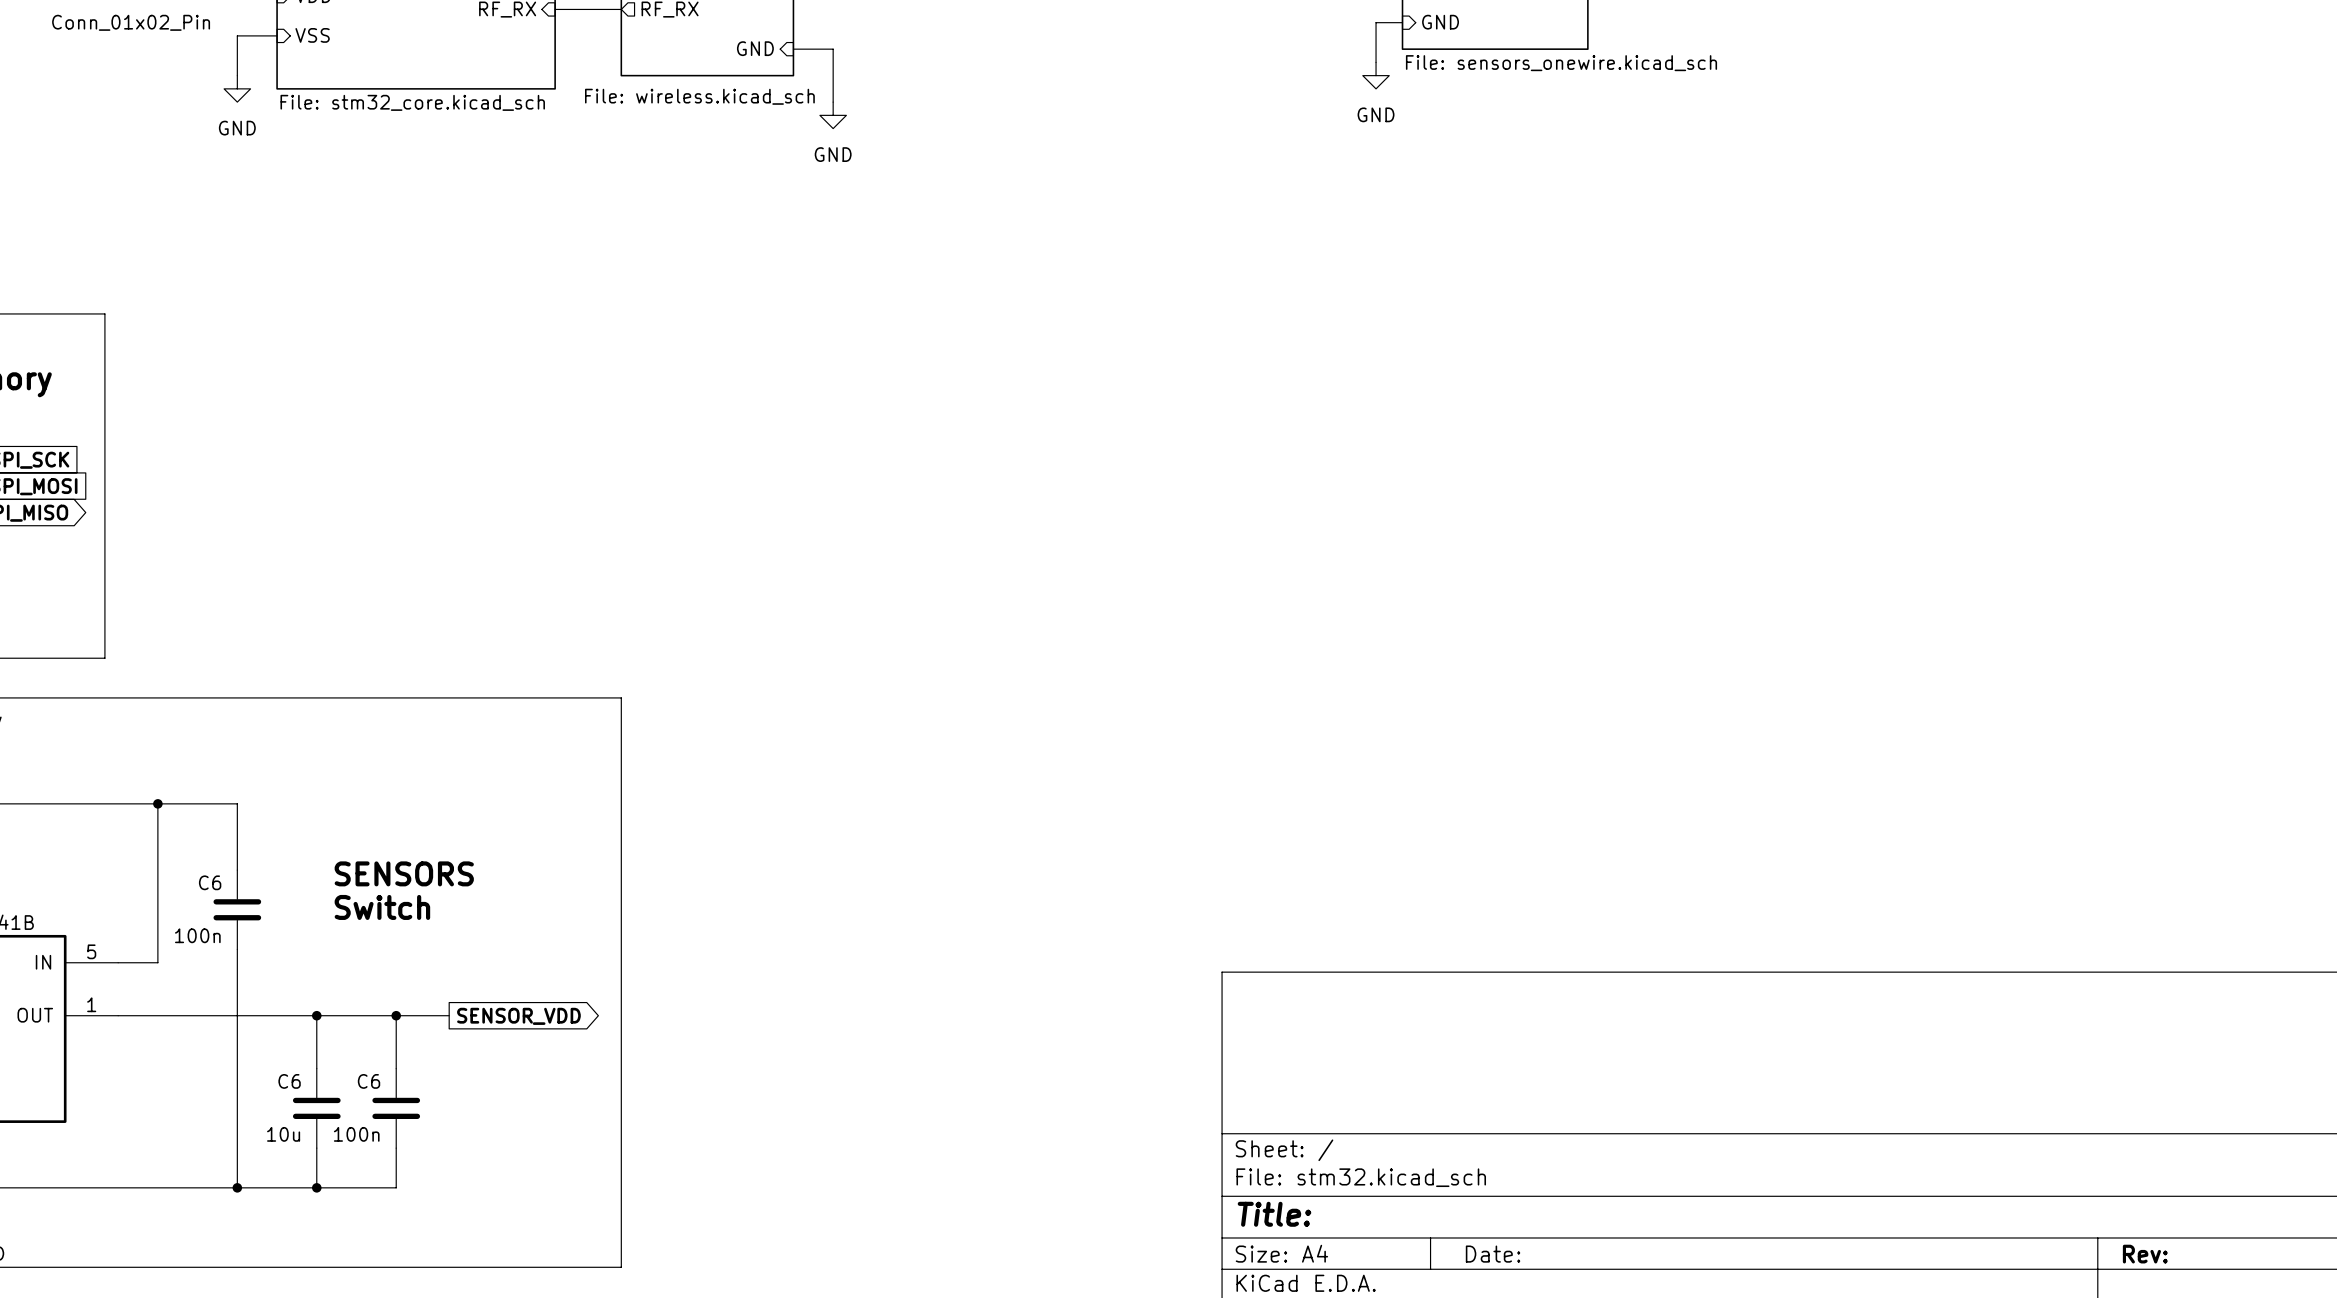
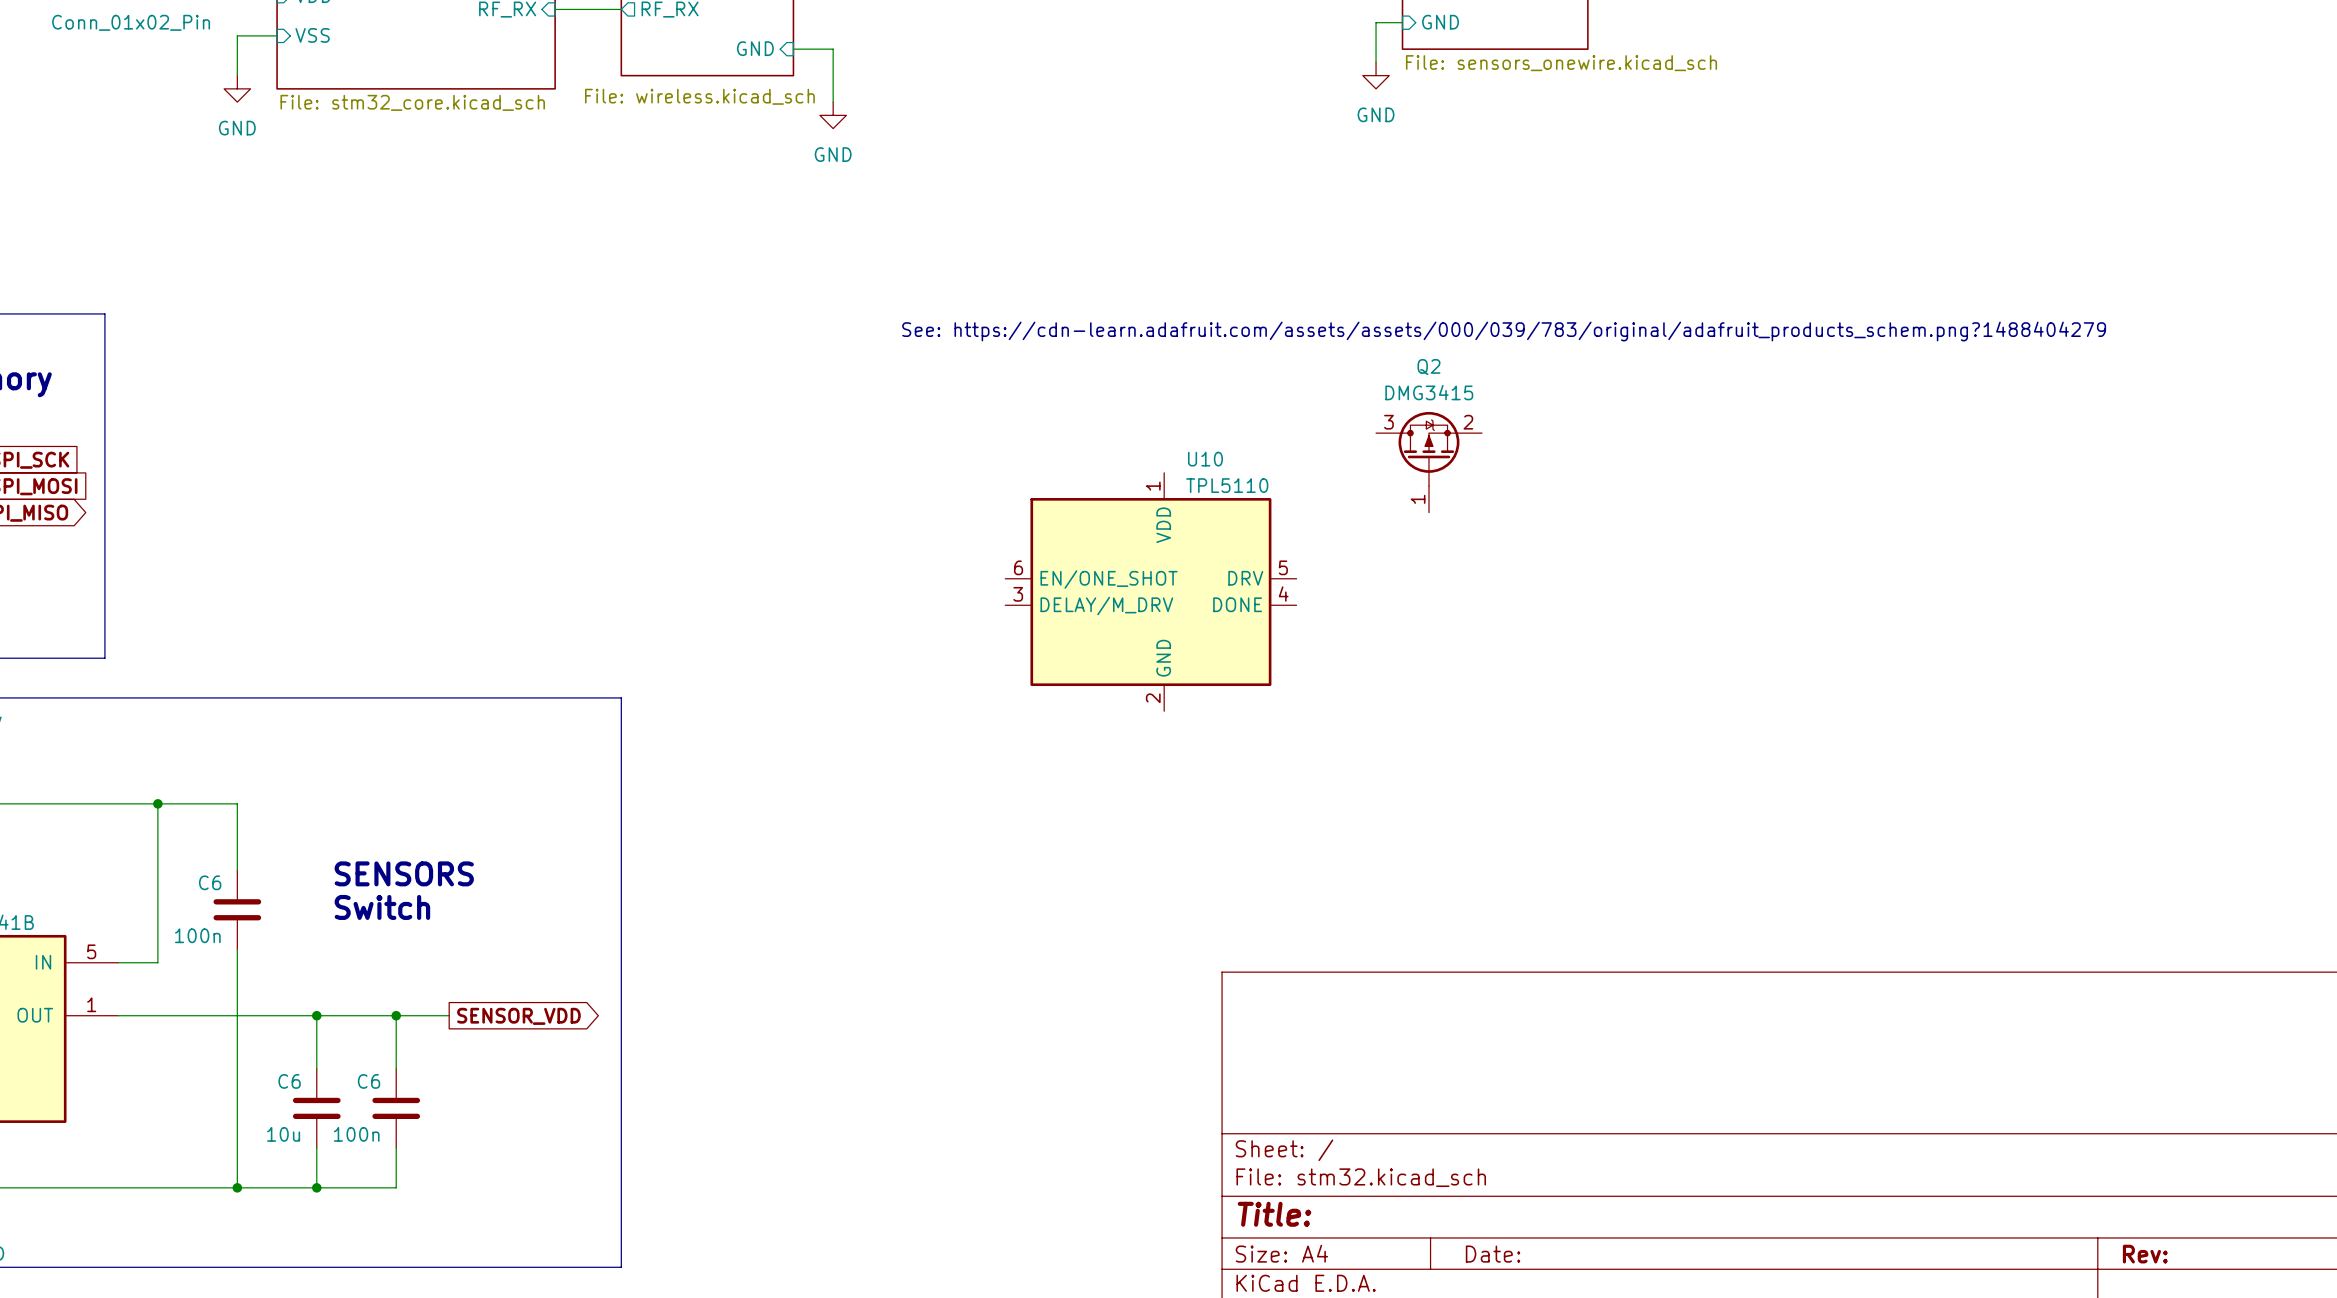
text: none -> See: https://cdn-learn.adafruit.com/assets/assets/000/039/783/original/adafruit_products_schem.png?1488404279 (1504, 331)
Q2: none -> DMG3415 (1428, 462)
U10: none -> TPL5110 (1150, 592)

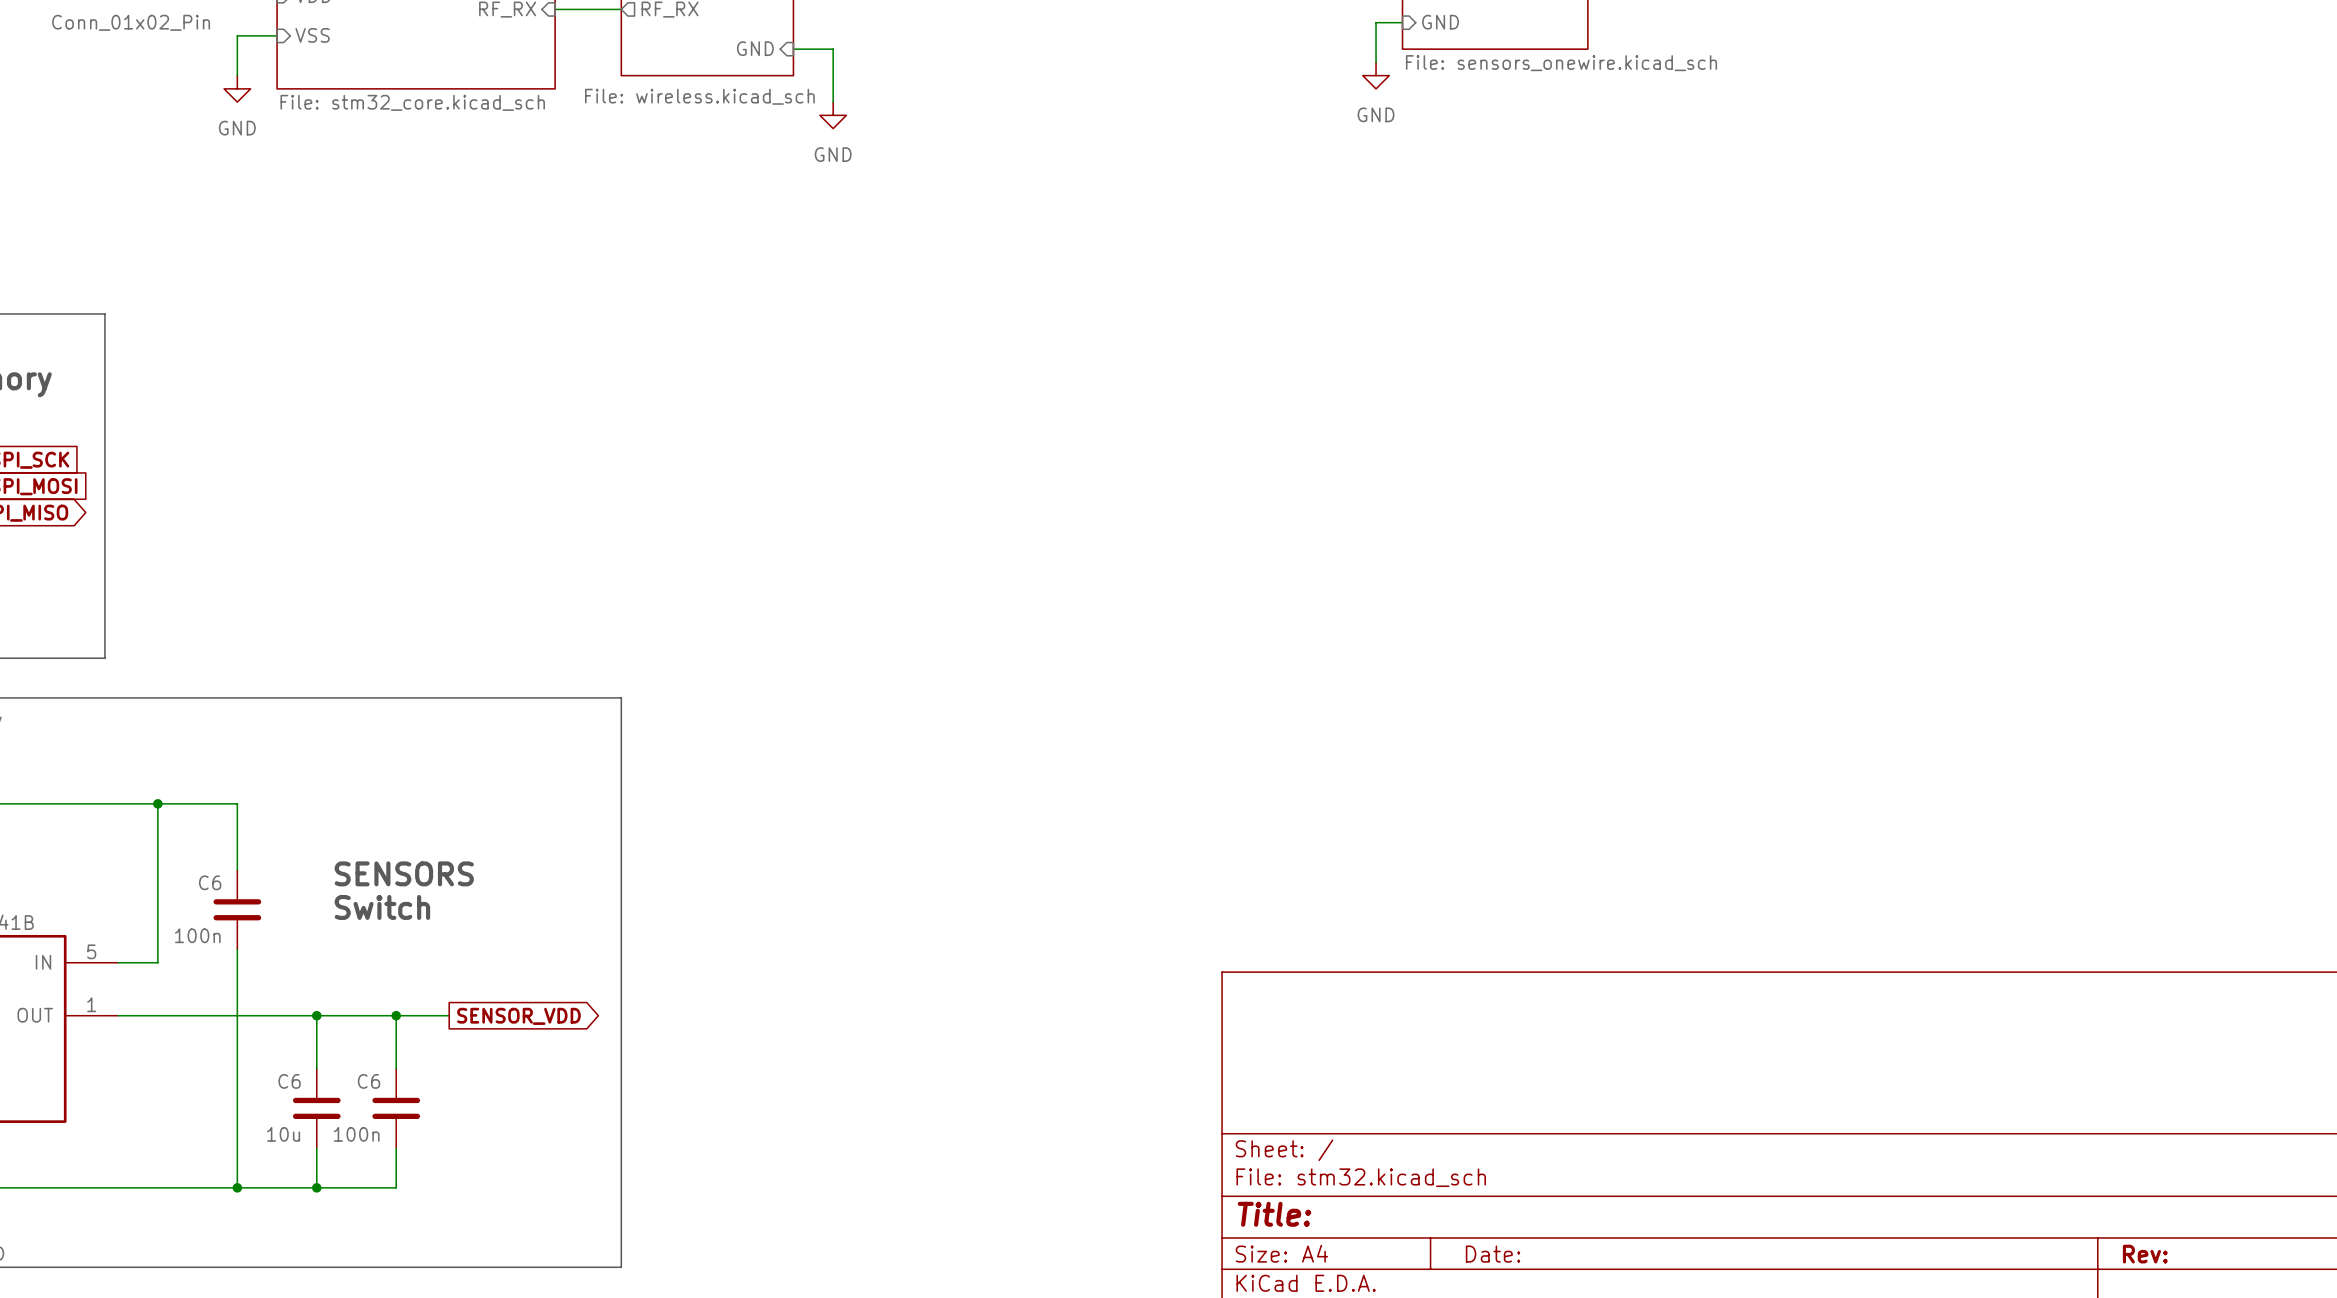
text: See: https://cdn-learn.adafruit.com/assets/assets/000/039/783/original/adafruit_products_schem.png?1488404279 (1504, 331) -> none
Q2: DMG3415 (1428, 462) -> none
U10: TPL5110 (1150, 592) -> none

